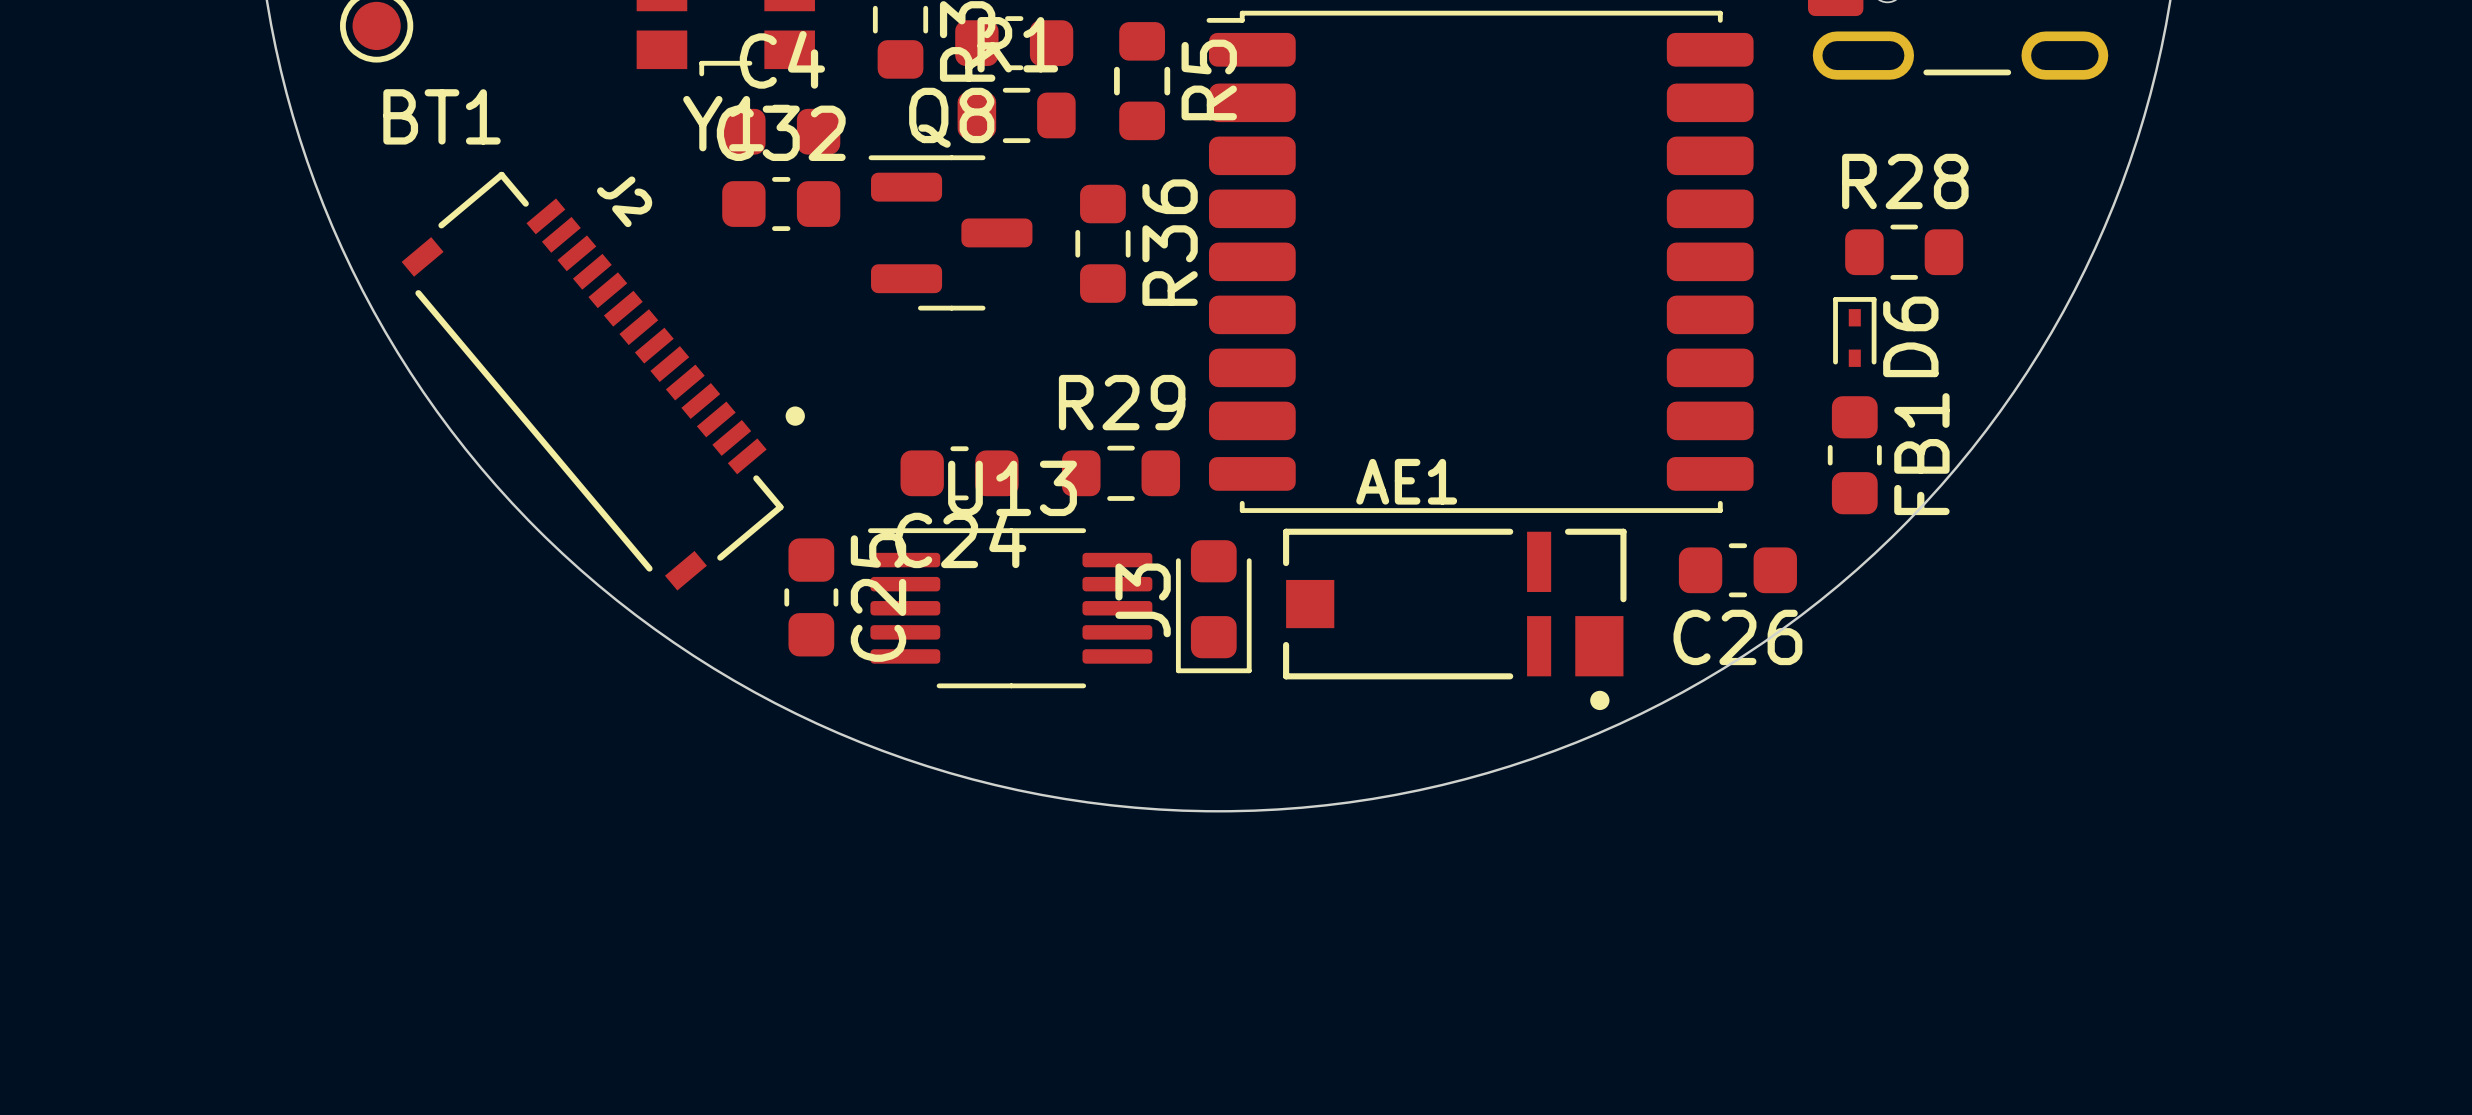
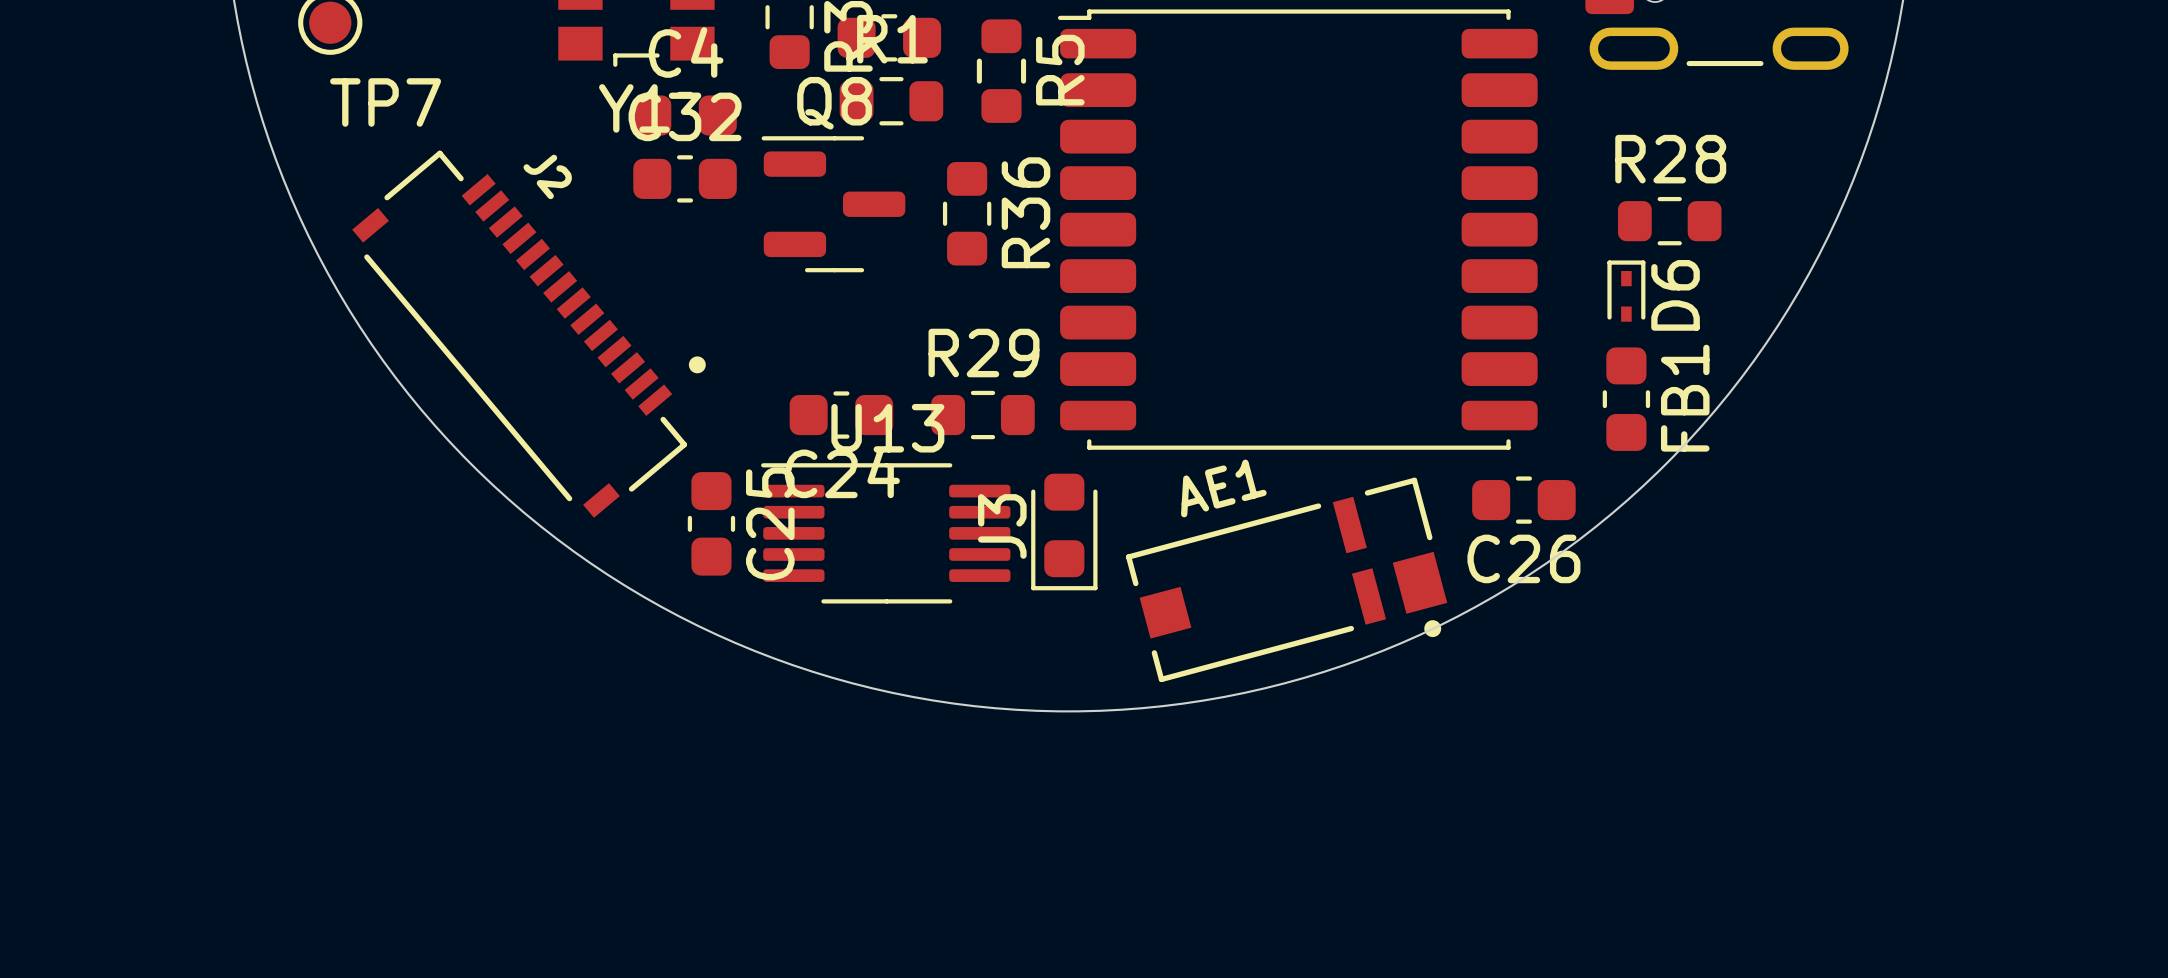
BT1 name: BT1 (442, 116) -> TP7 (385, 102)
AE1 rotation: 0° (1454, 619) -> 15° counterclockwise (1286, 579)

